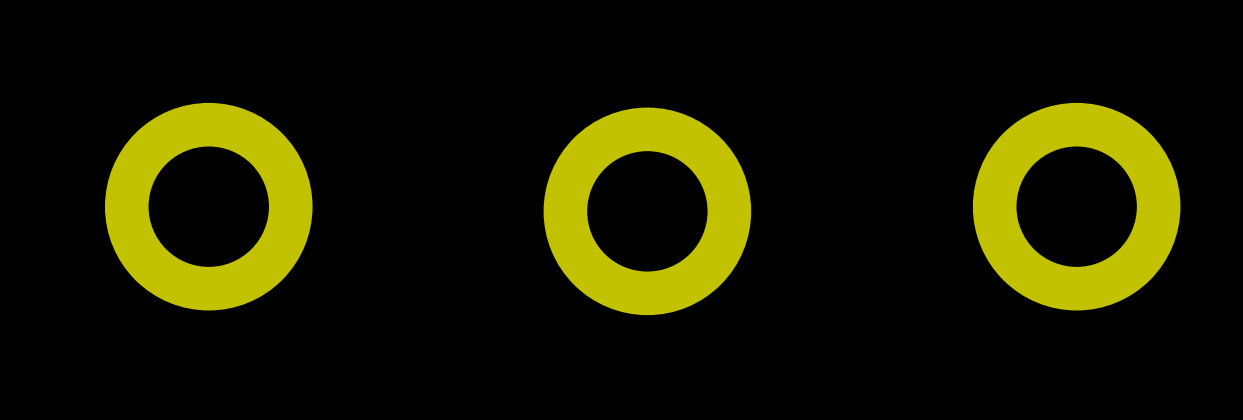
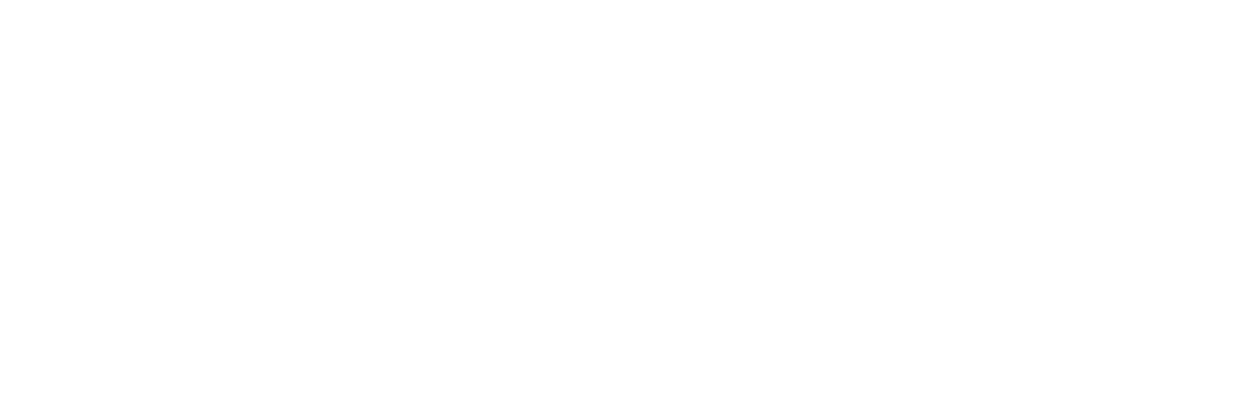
part: (208, 206) -> none
part: (1076, 206) -> none
part: (647, 211) -> none

